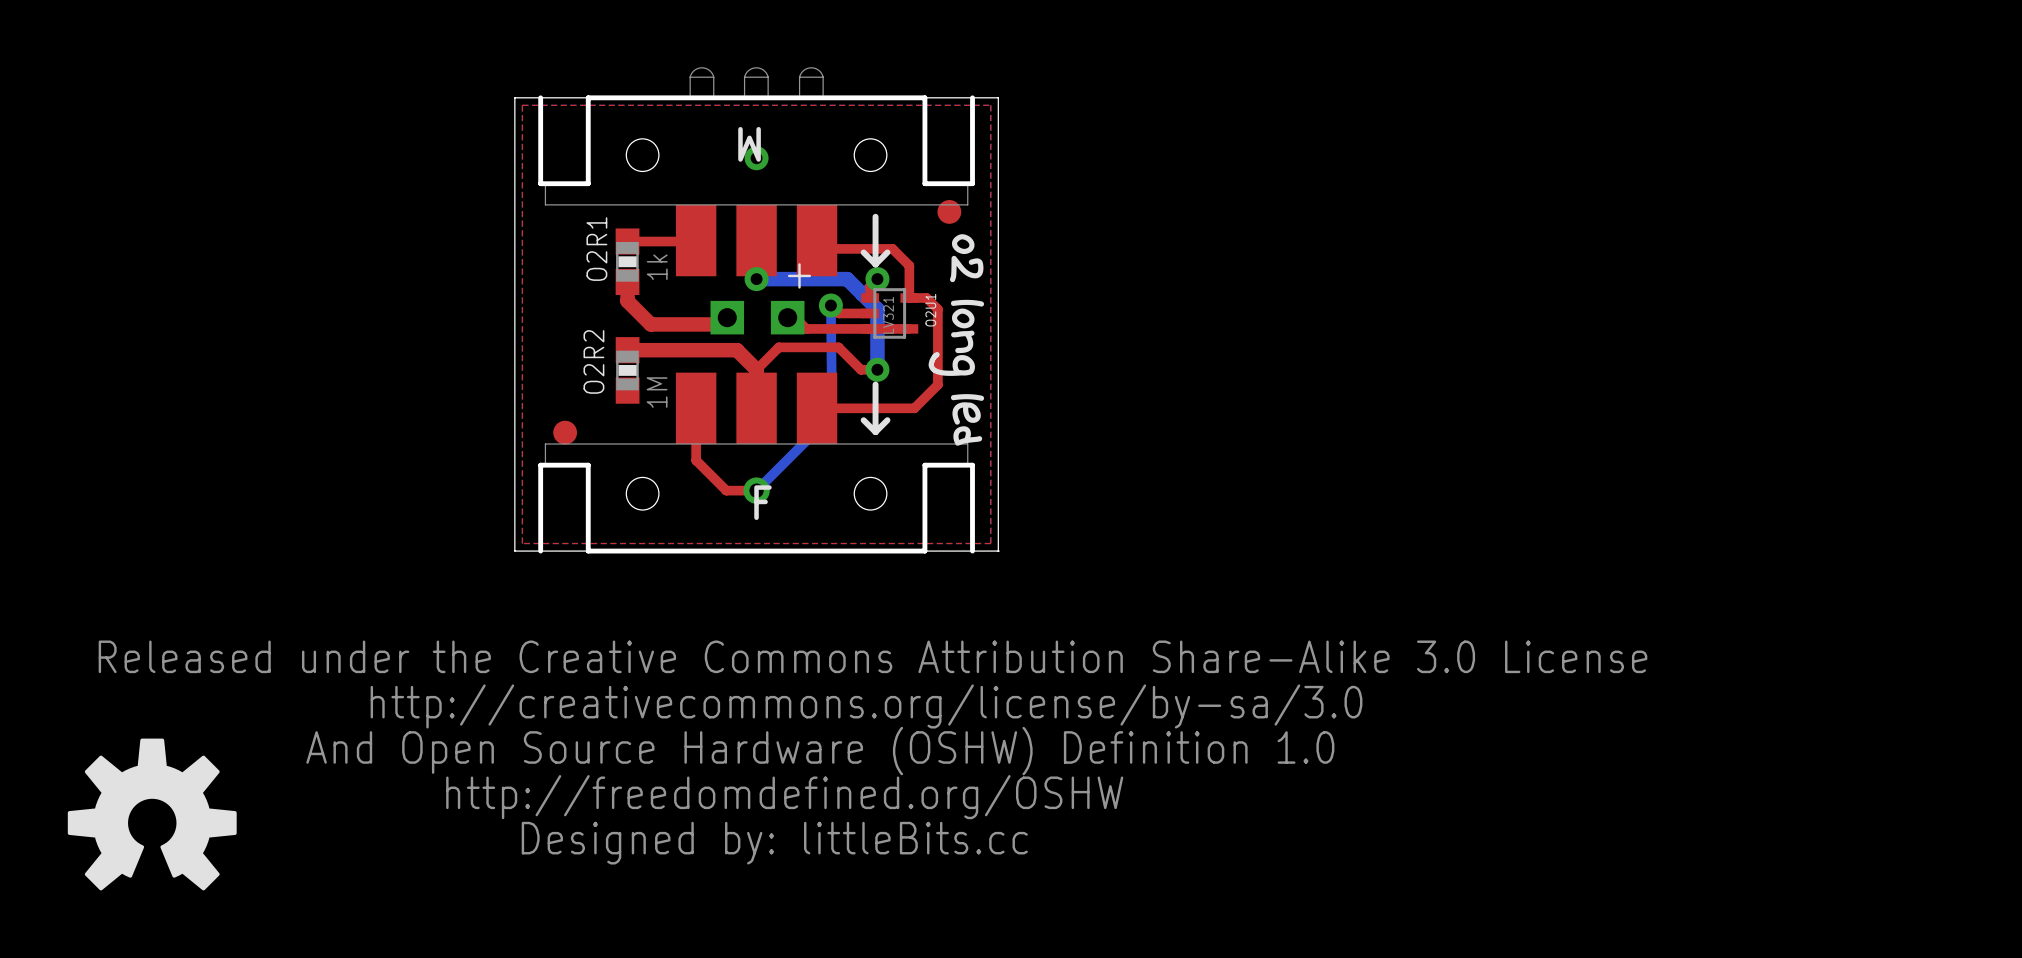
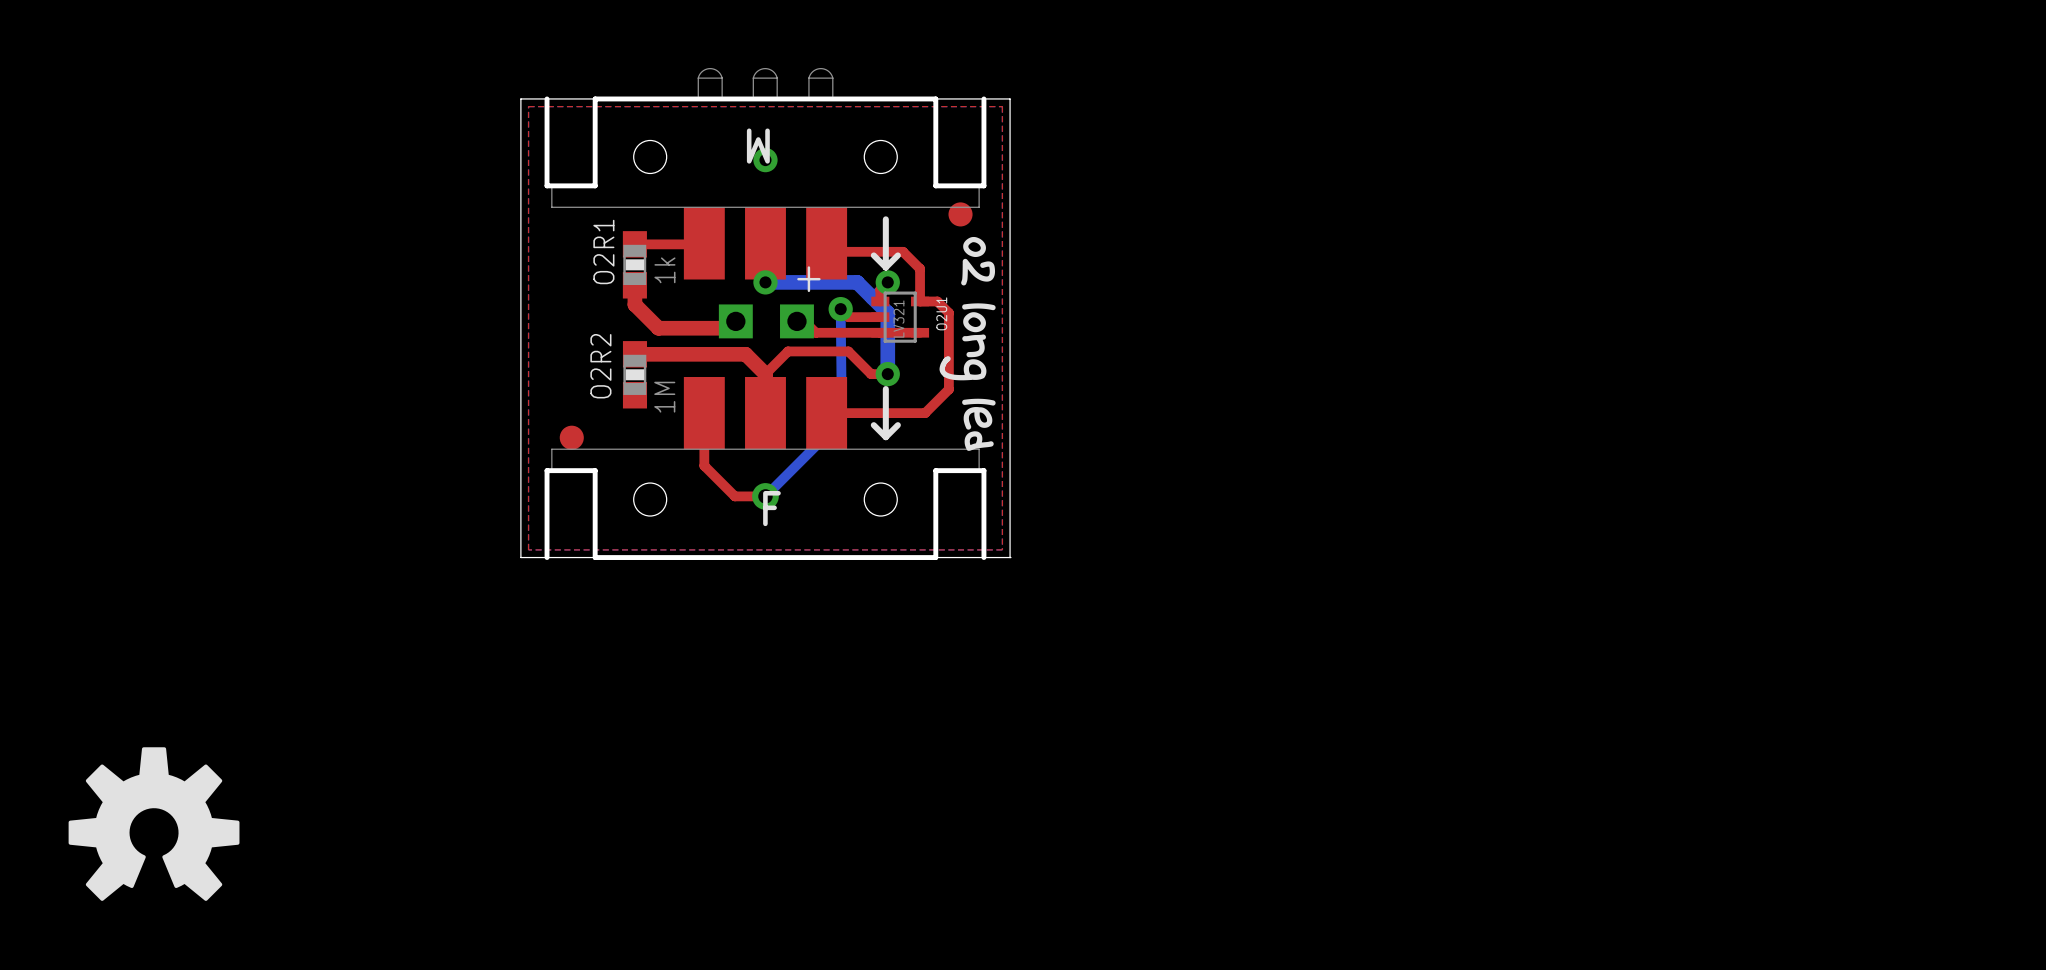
drawing: [98, 640, 1648, 865] -> none

